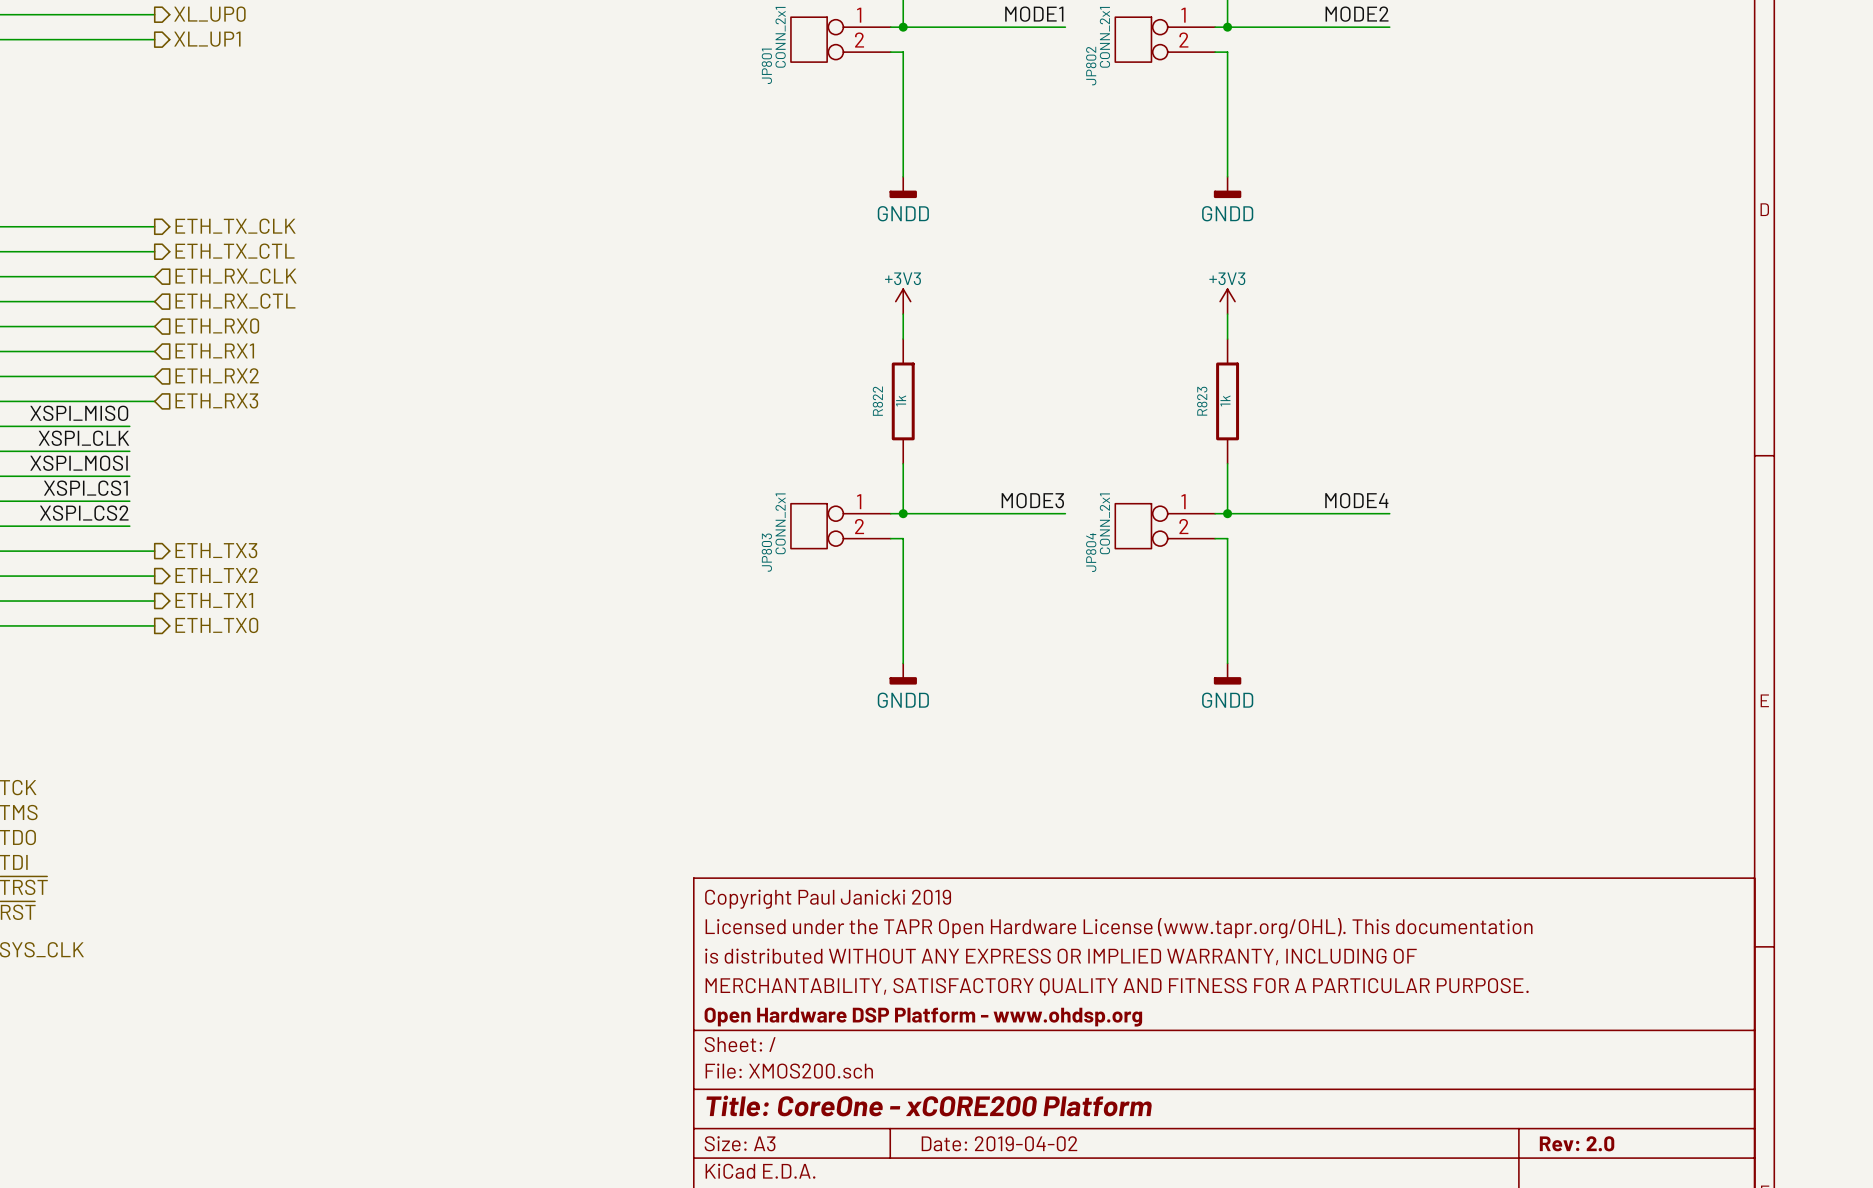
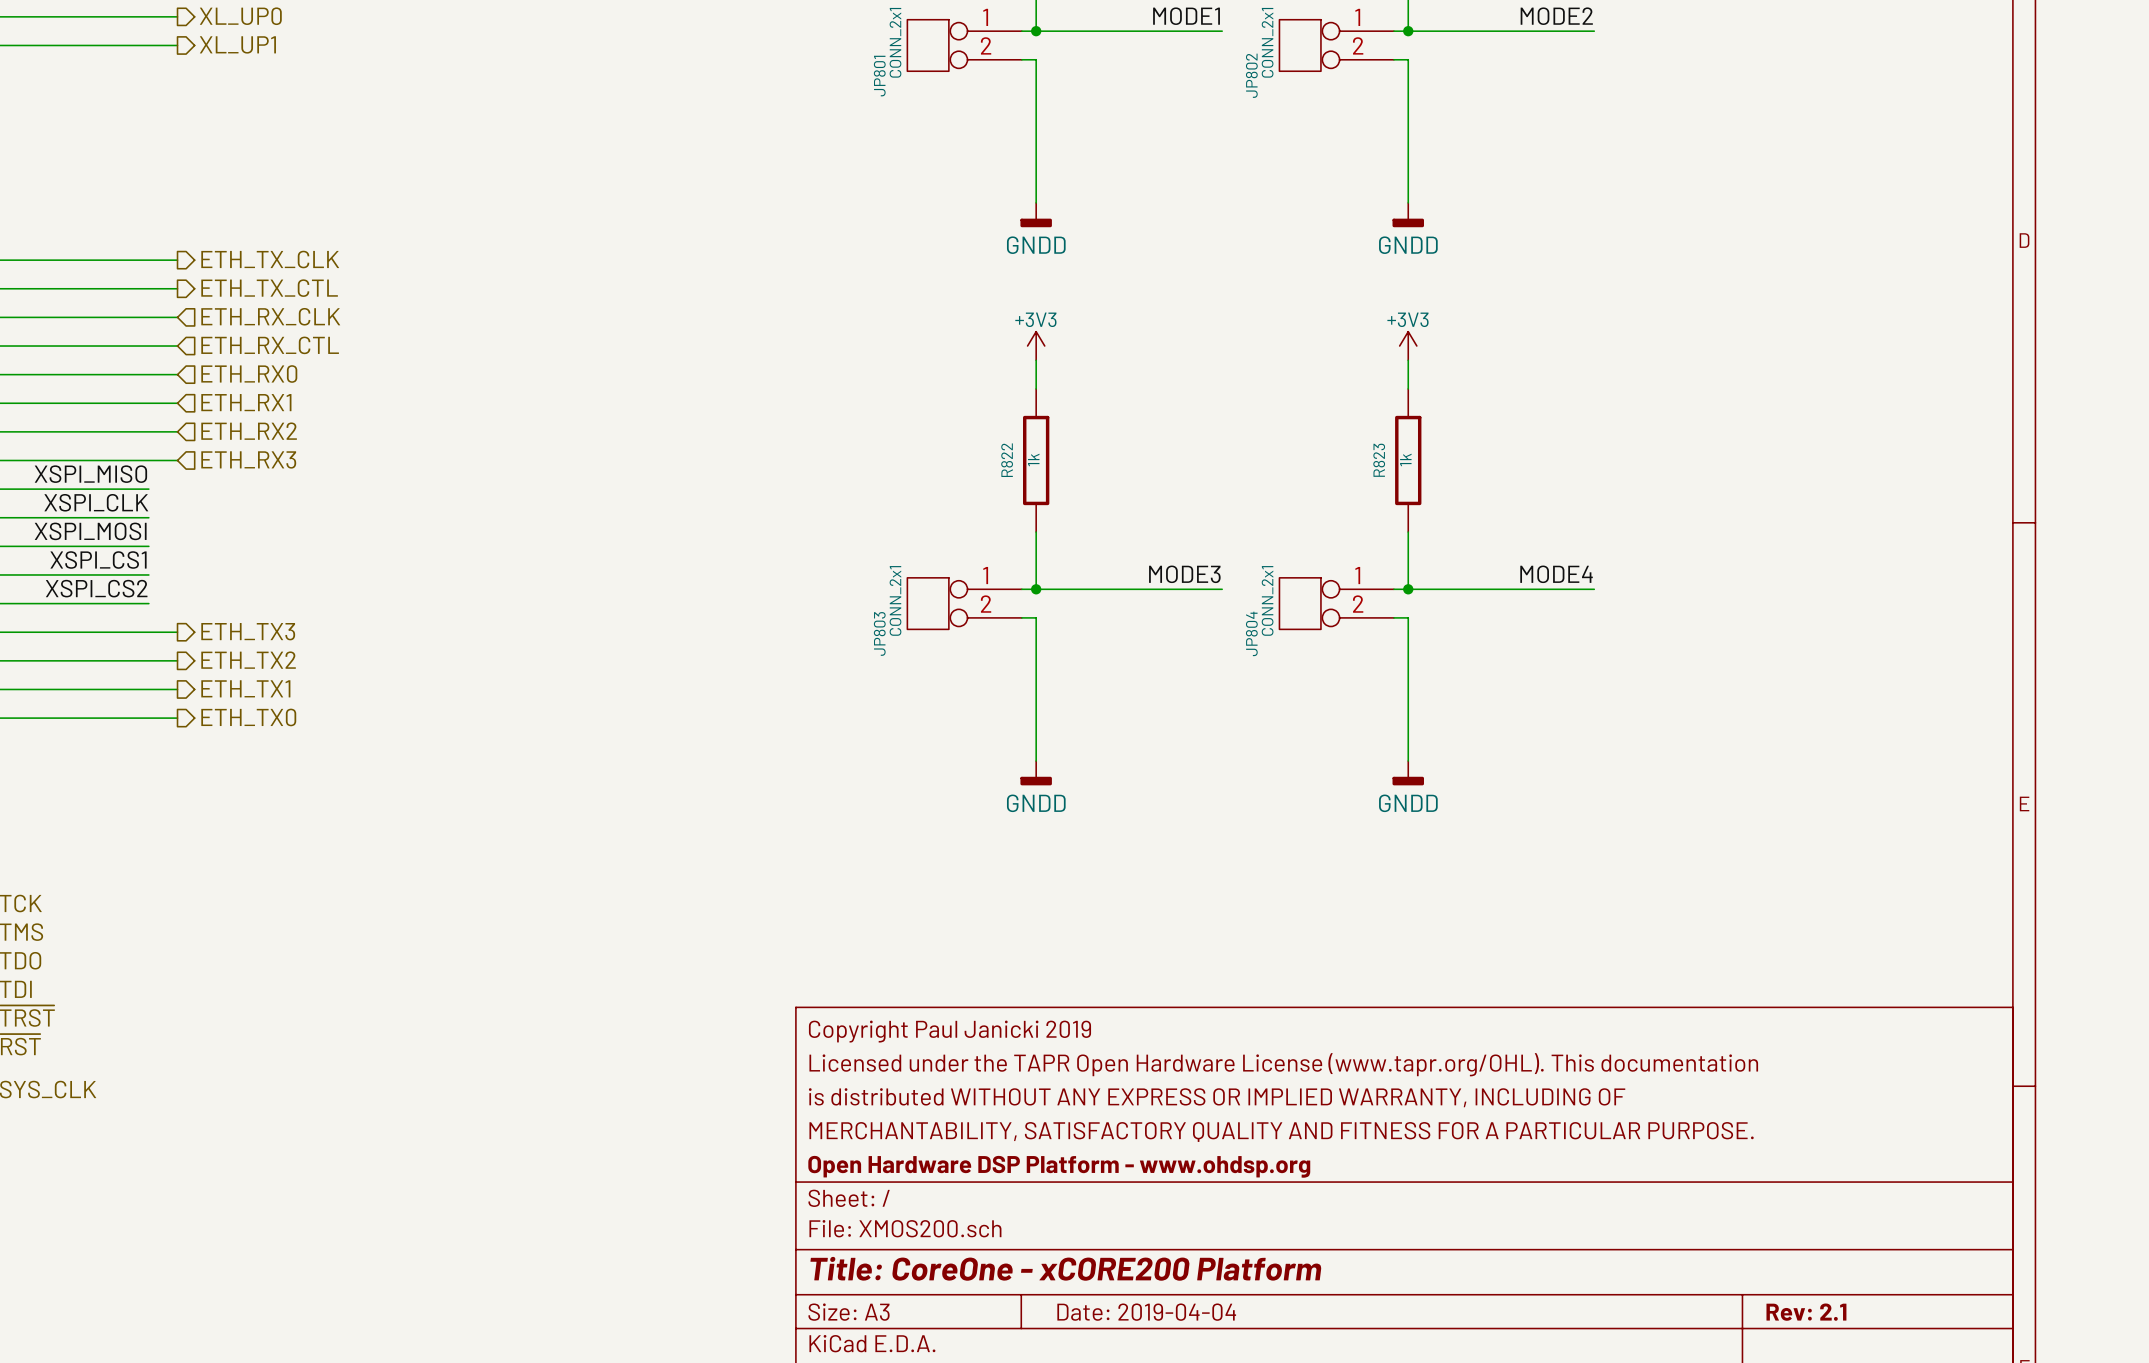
title block: Date: 2019-04-02 (999, 1143) -> Date: 2019-04-04 (1146, 1312)
title block: Rev: 2.0 (1577, 1143) -> Rev: 2.1 (1806, 1312)

